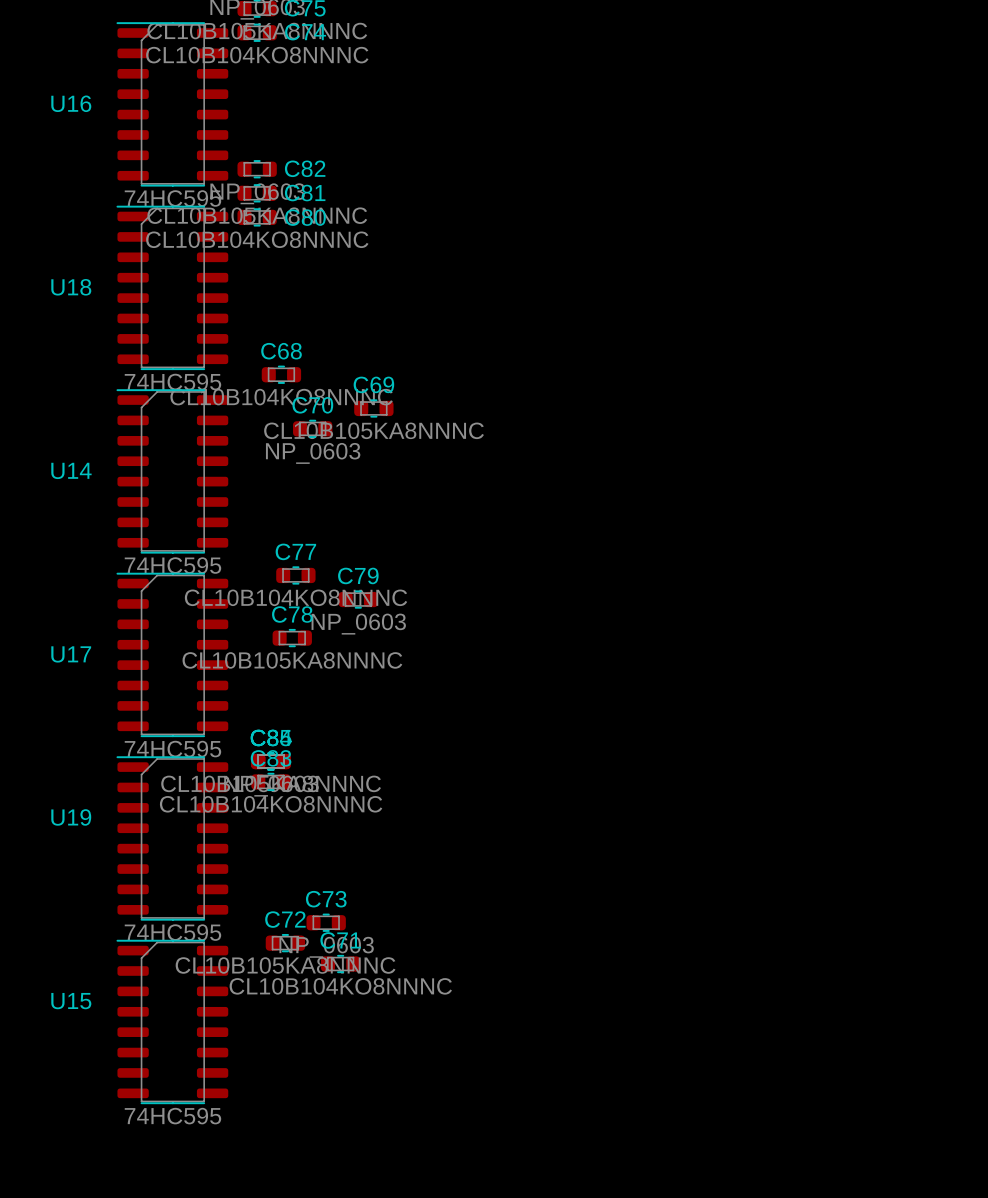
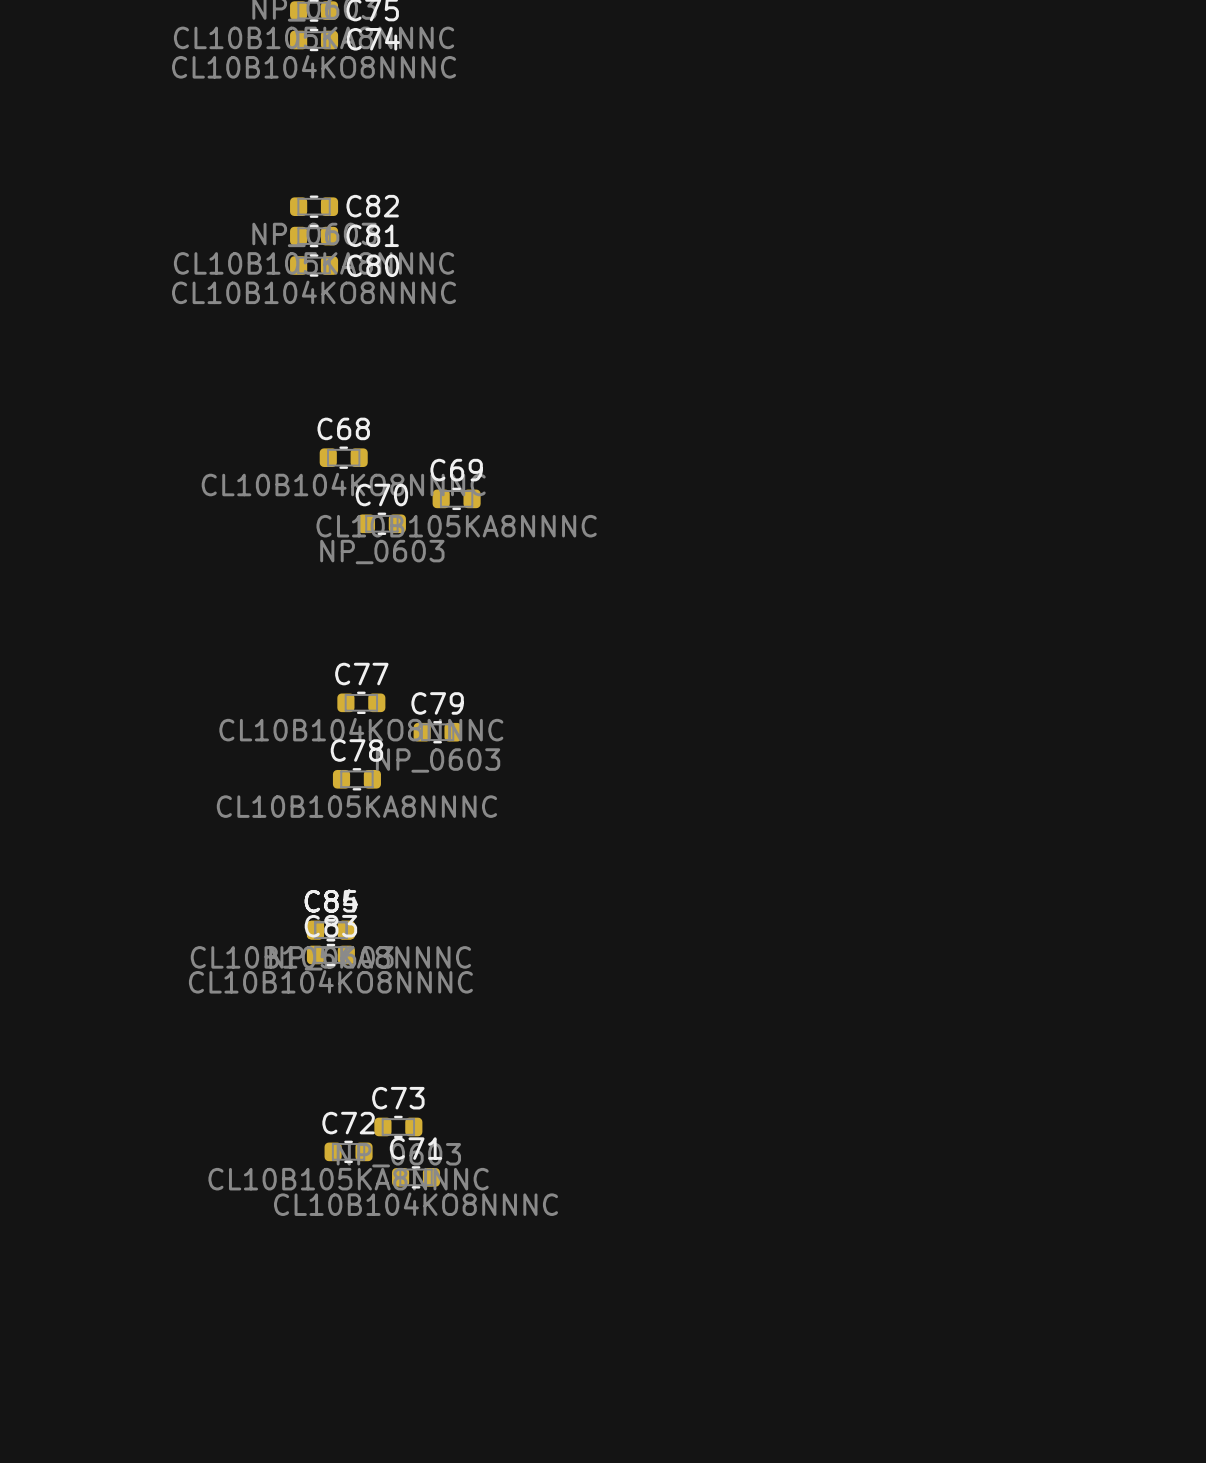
U16: 74HC595 (172, 104) -> none
U18: 74HC595 (172, 287) -> none
U14: 74HC595 (172, 471) -> none
U17: 74HC595 (172, 654) -> none
U19: 74HC595 (172, 838) -> none
U15: 74HC595 (172, 1021) -> none

